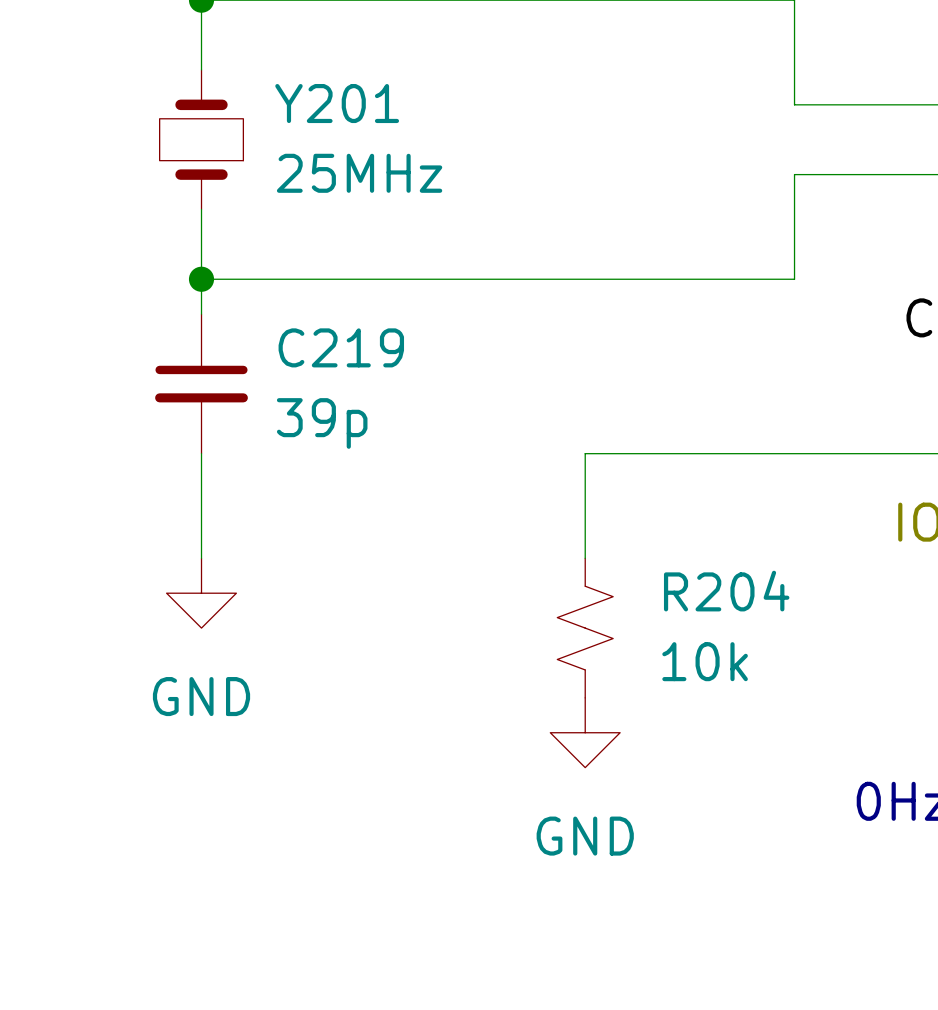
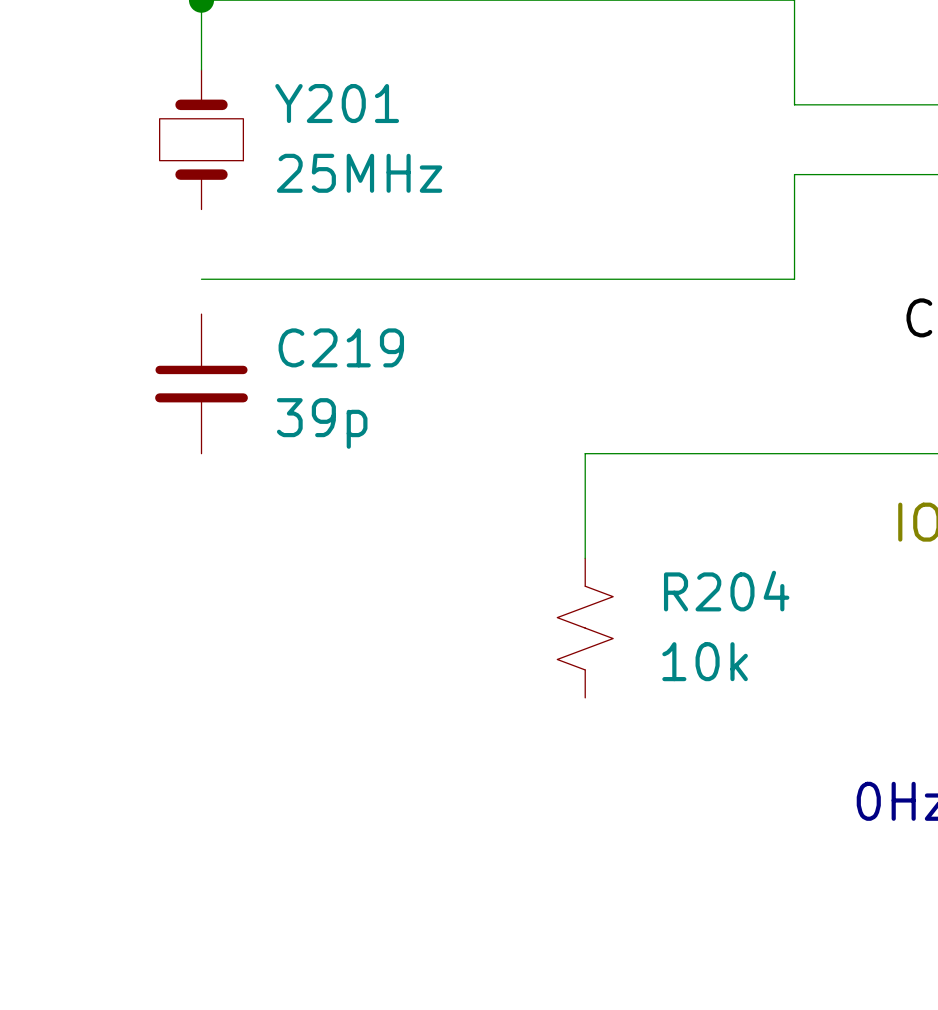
wire: (201, 209) (201, 314) -> none
junction: (201, 279) -> none
wire: (201, 453) (201, 558) -> none
power symbol: GND (201, 593) -> none
power symbol: GND (585, 732) -> none

